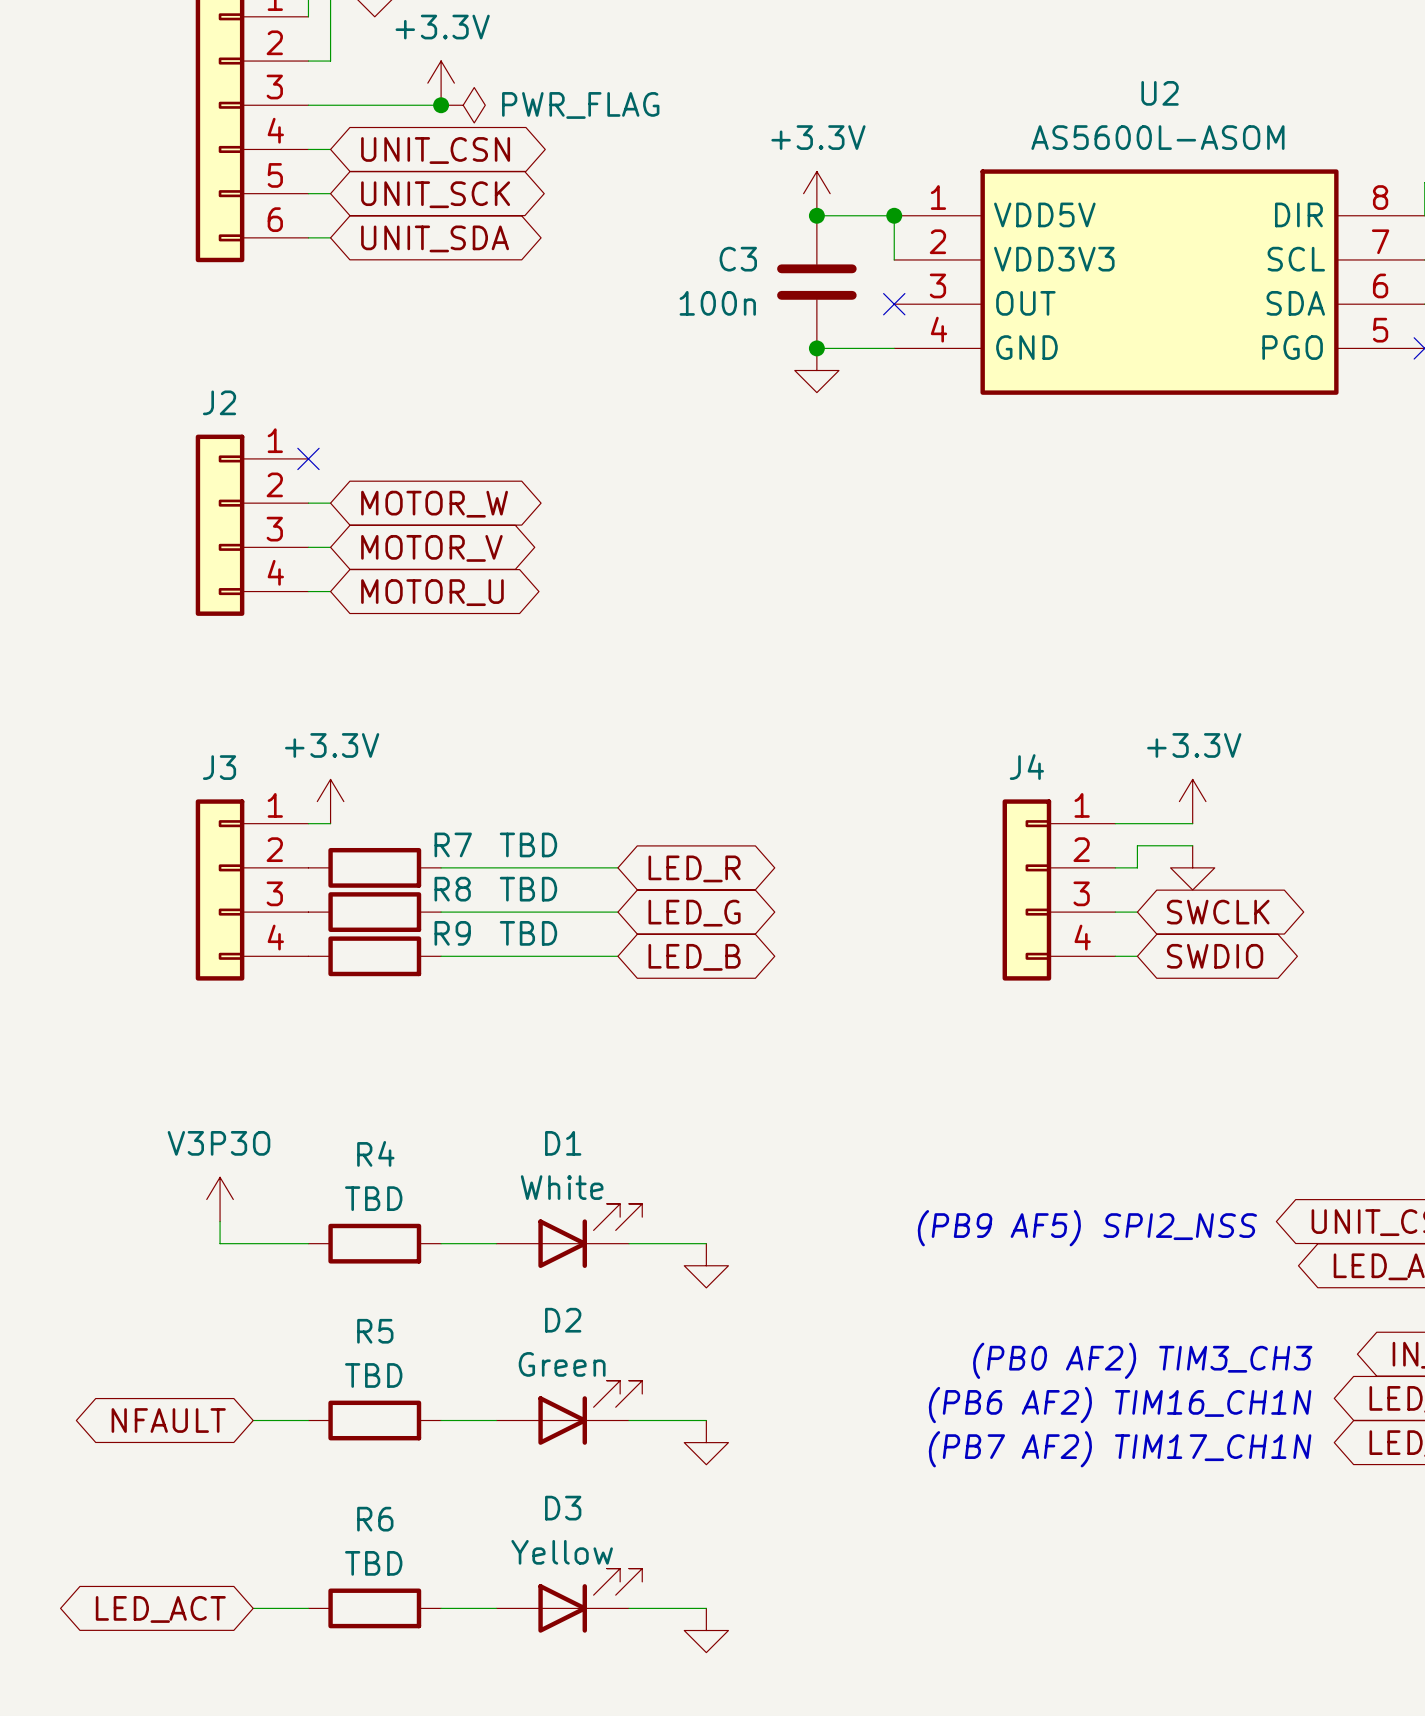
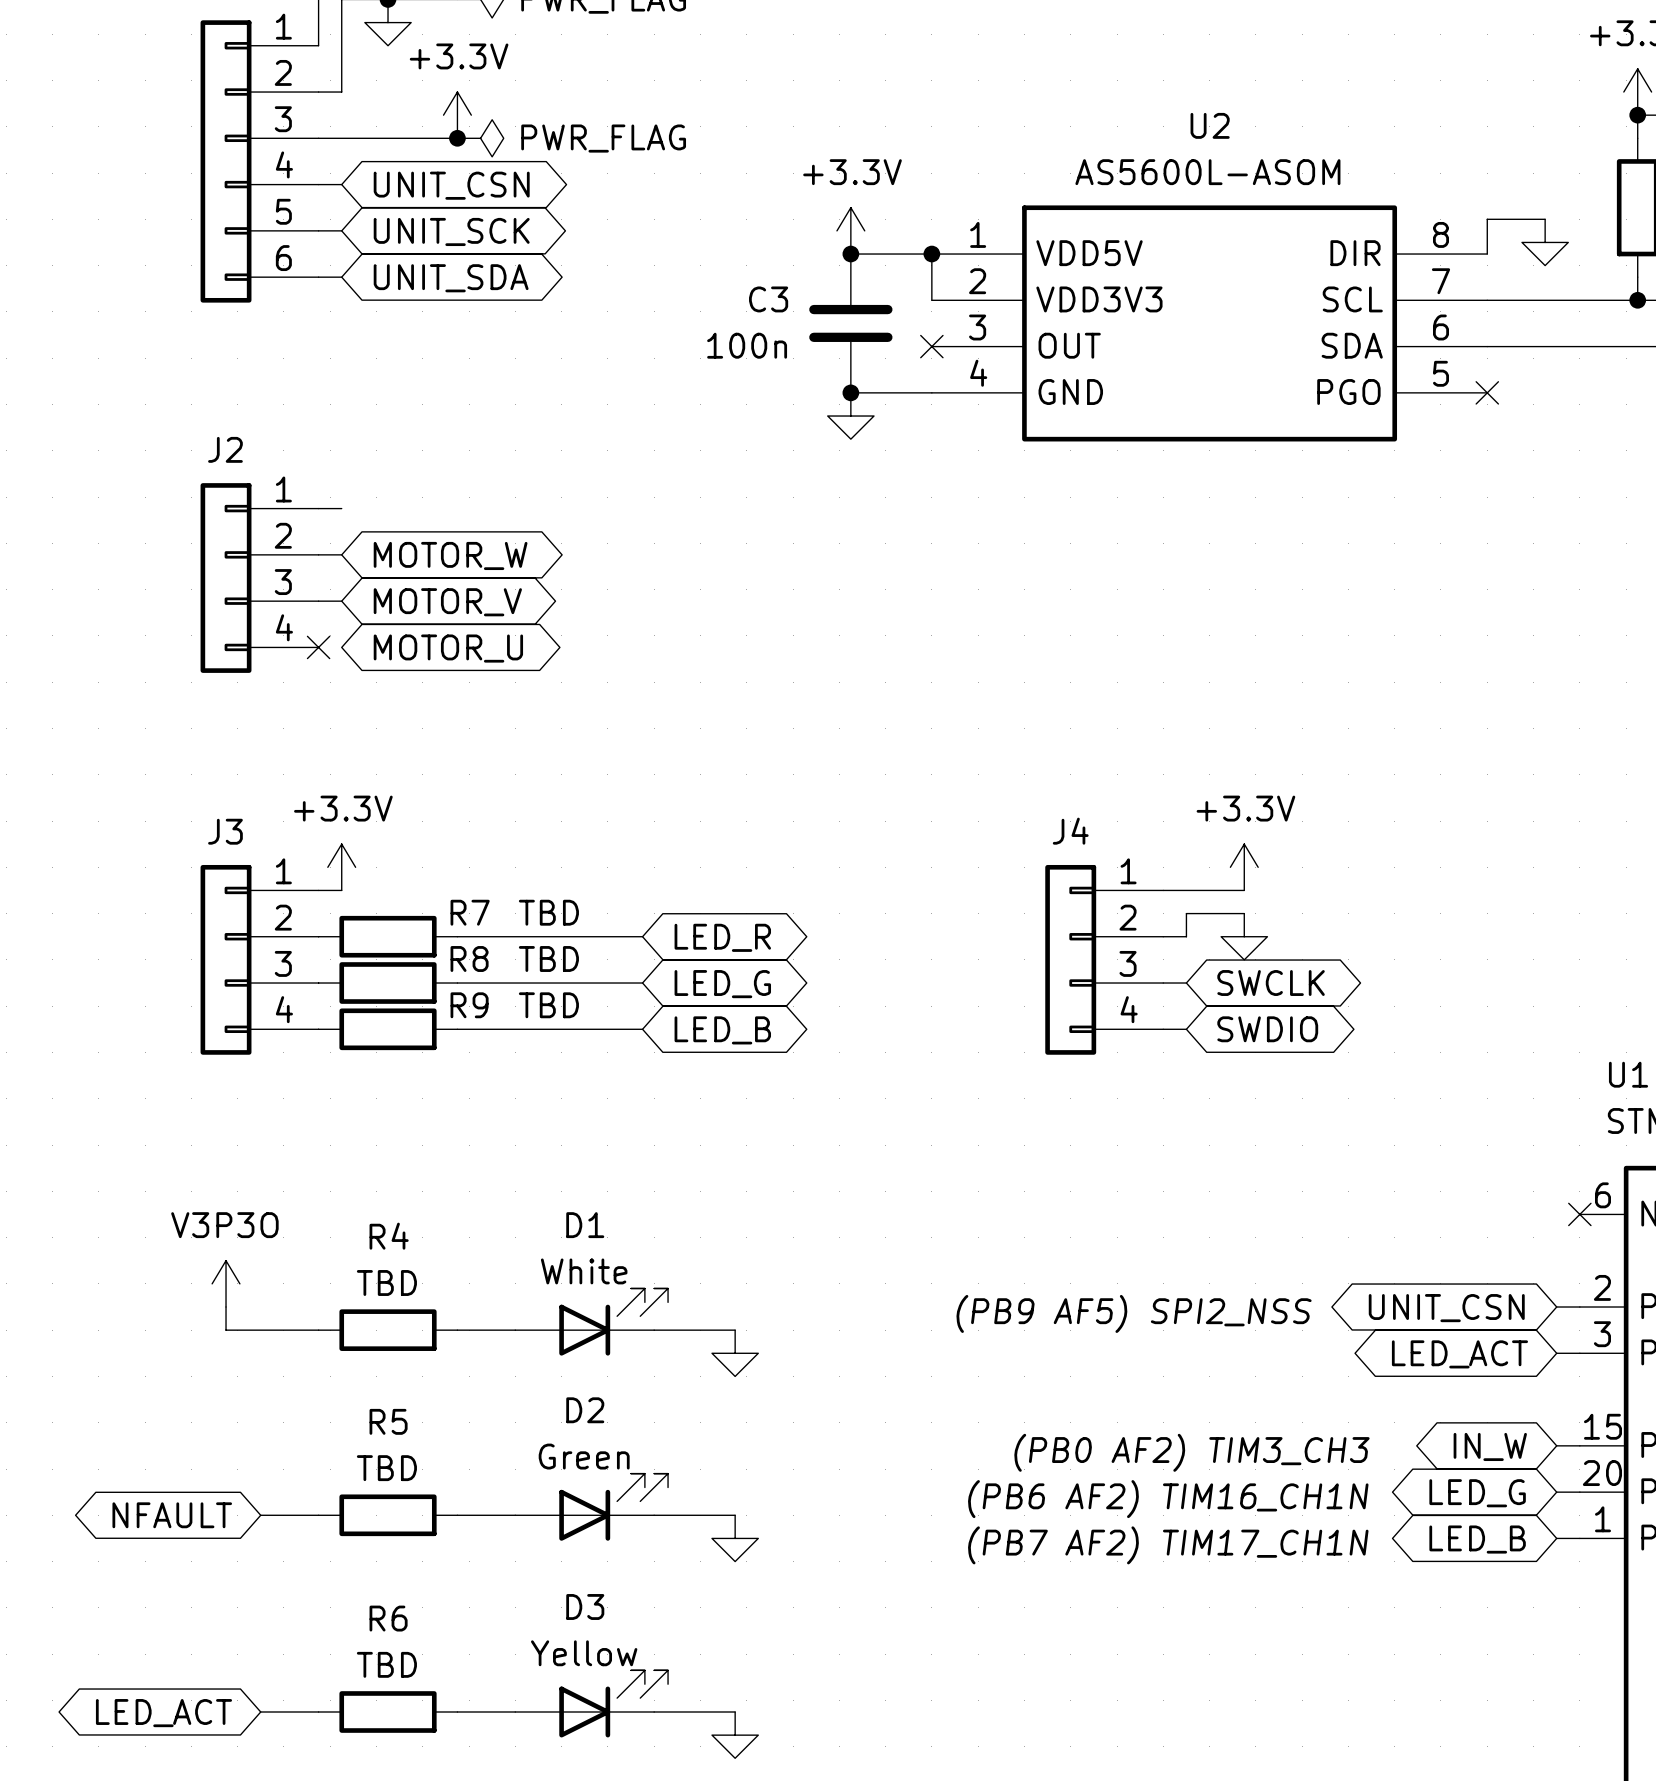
no-connect mark: (308, 458) -> none
wire: (308, 591) (330, 591) -> (318, 508) (341, 508)
no-connect mark: none -> (318, 647)

